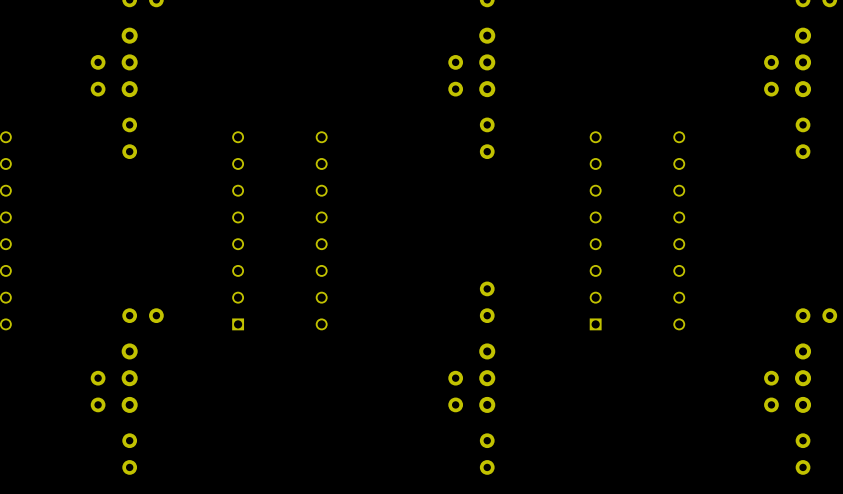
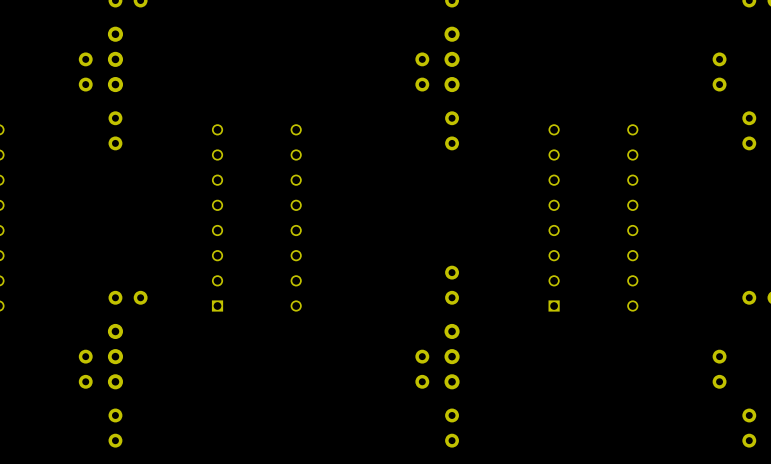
part: (803, 62) -> none
part: (803, 378) -> none

